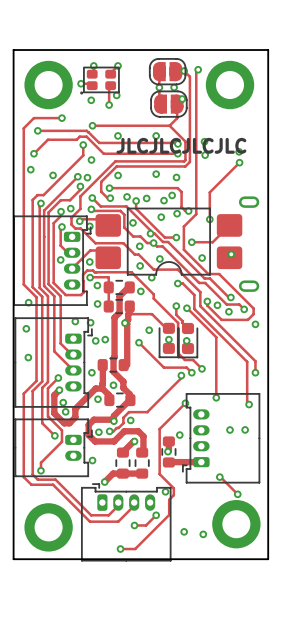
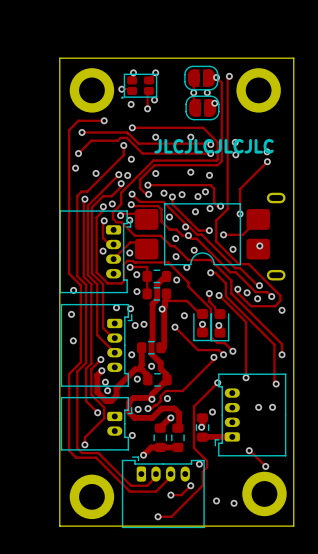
track: (177, 104) (177, 118) (169, 125) -> none

